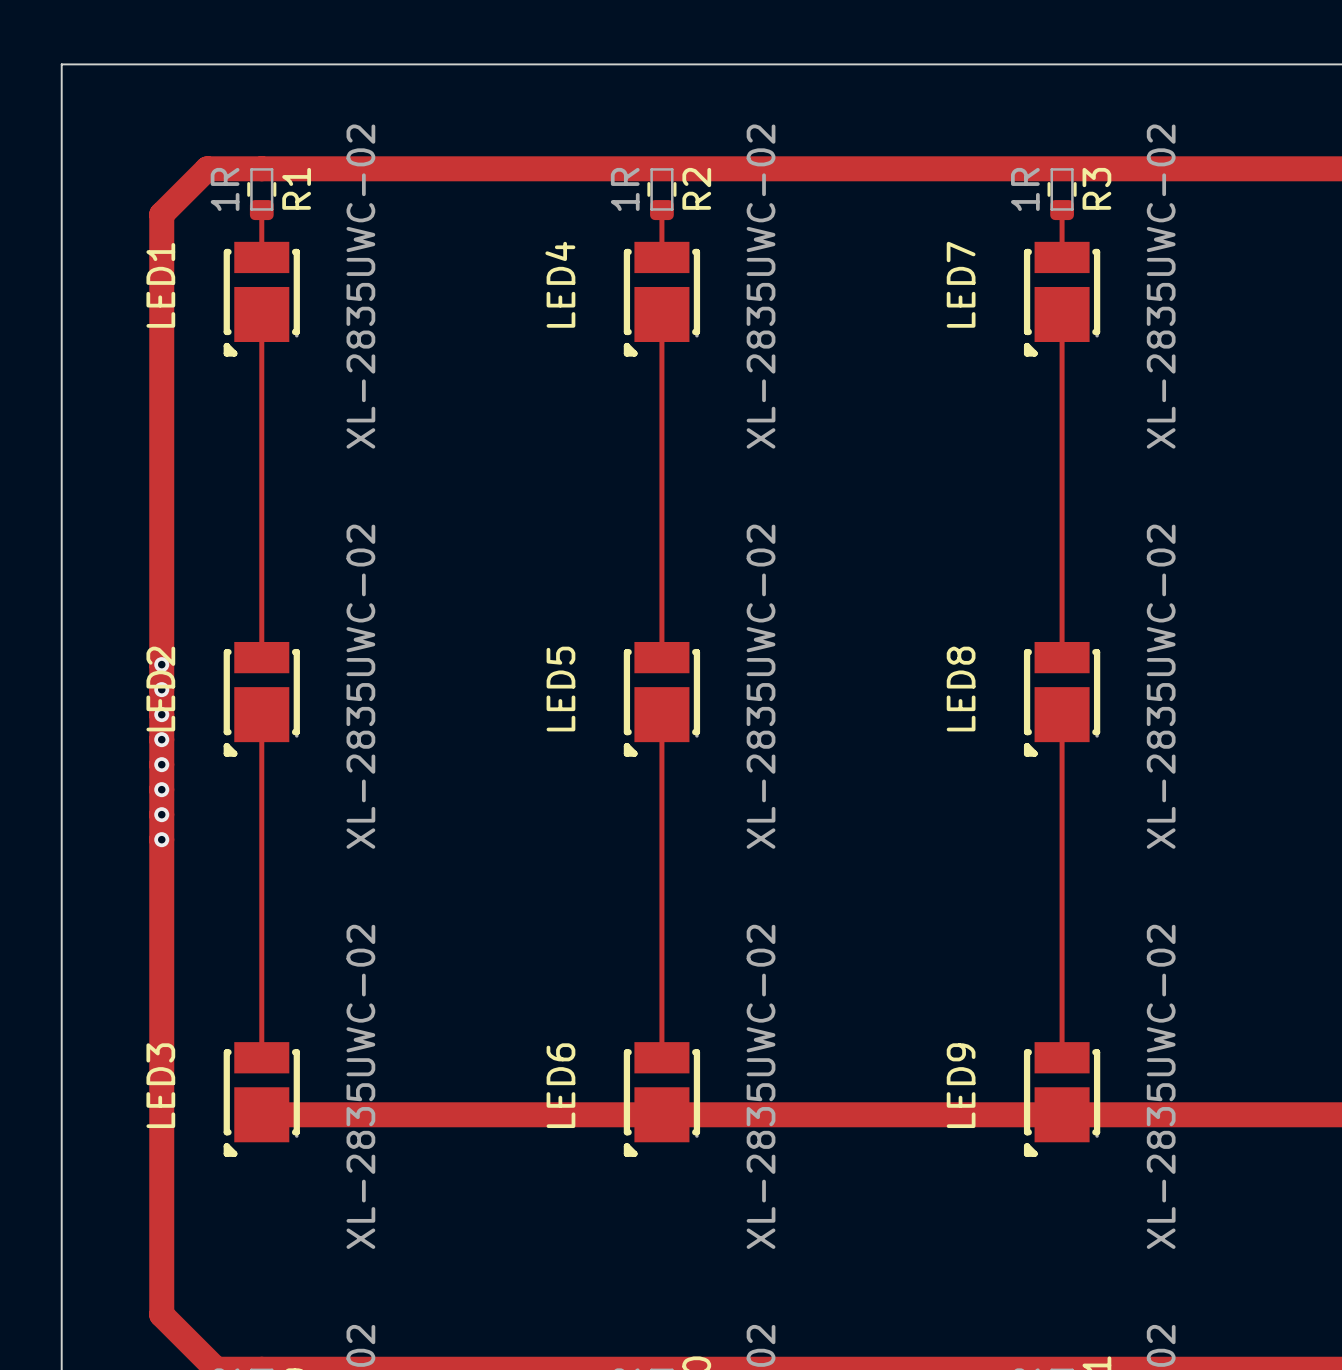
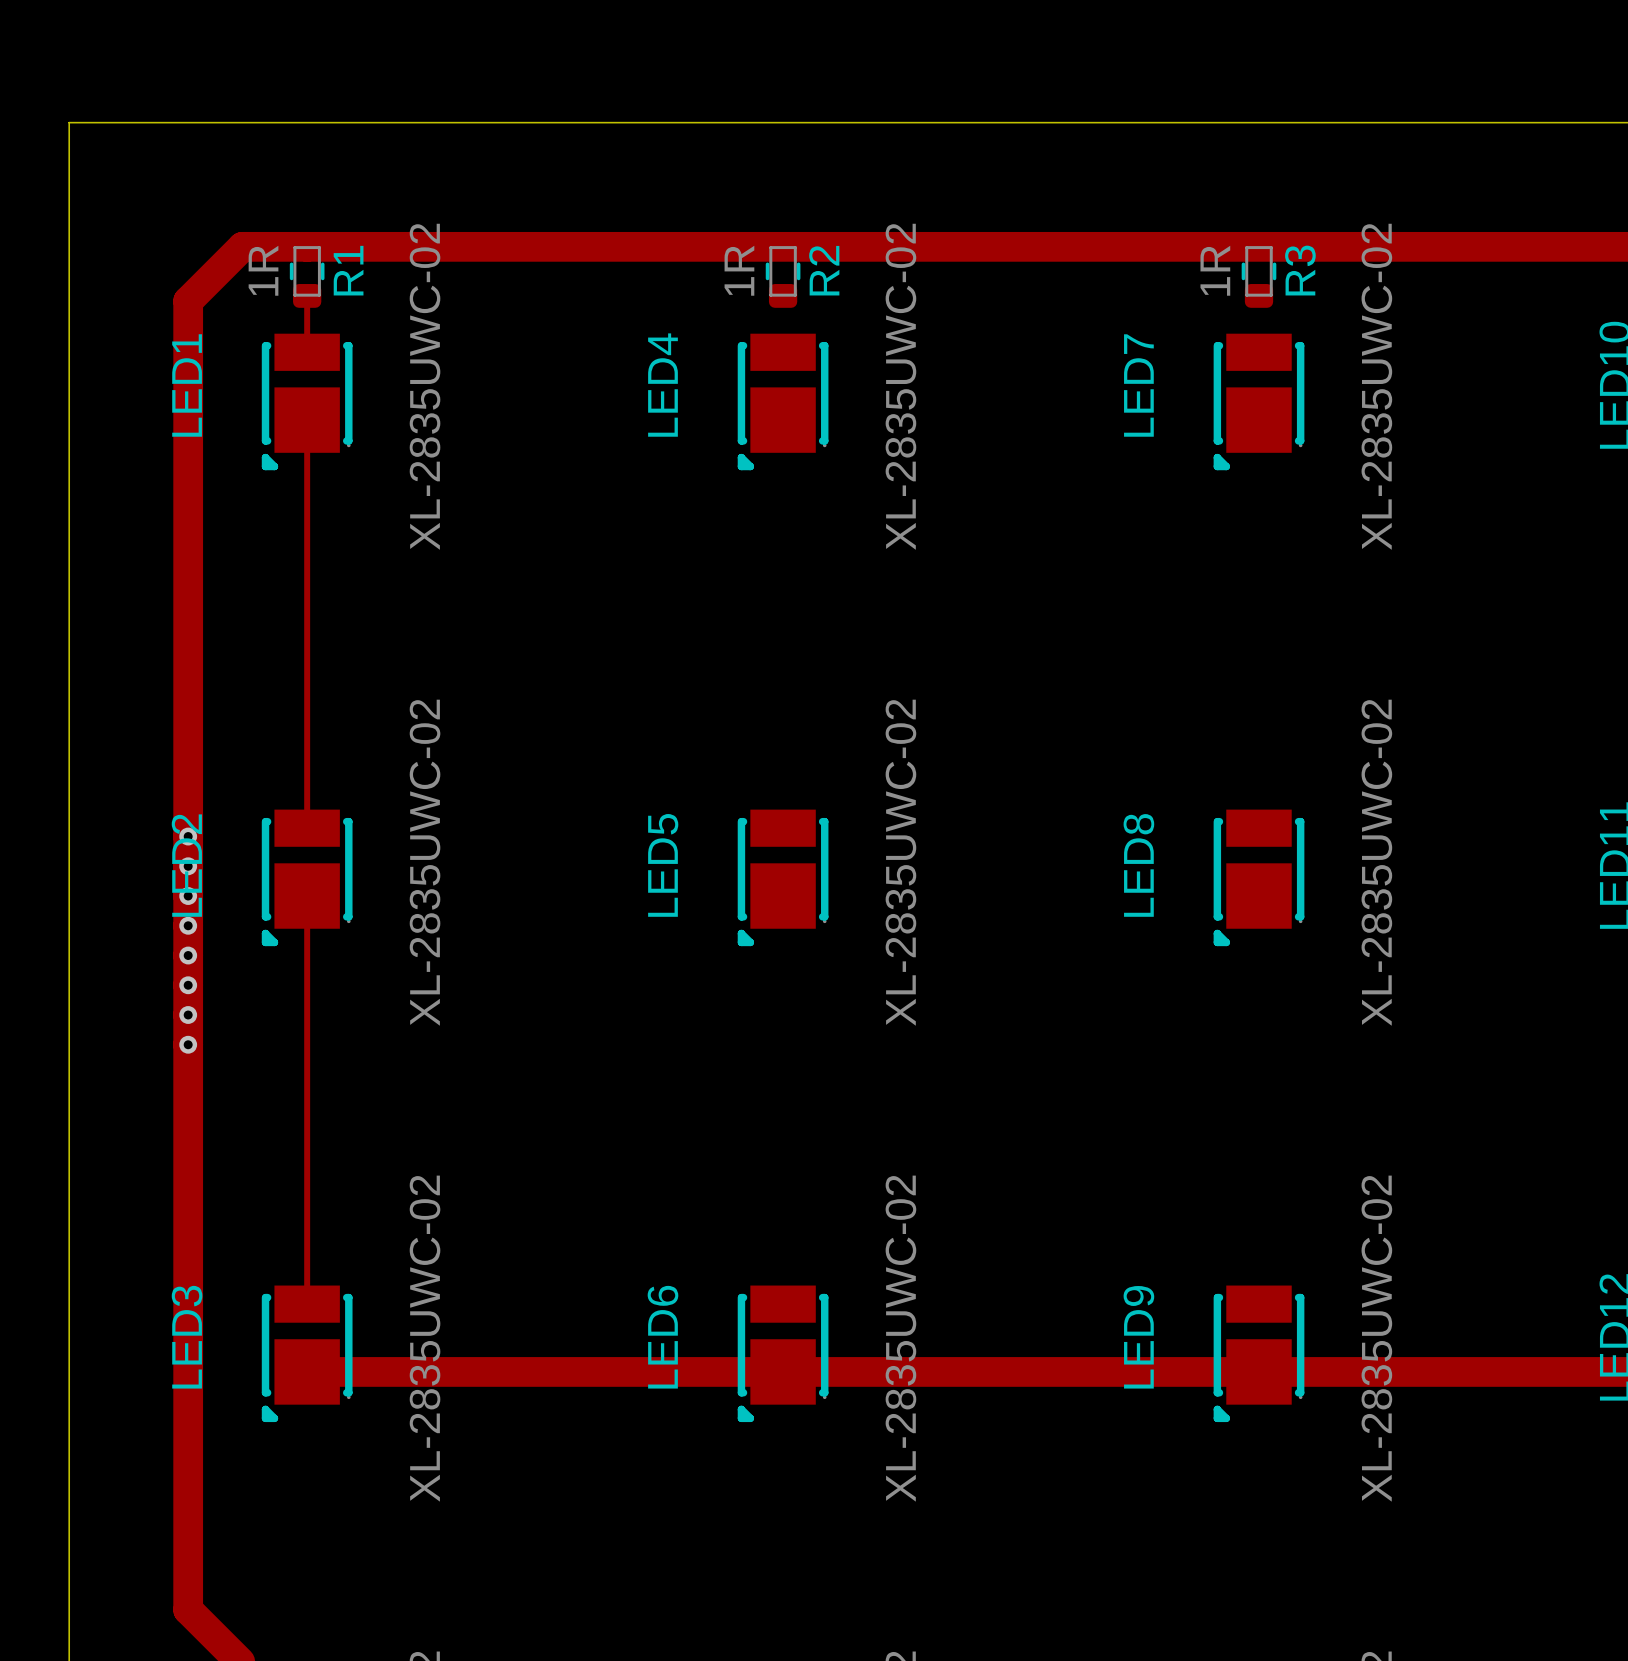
track: (661, 210) (661, 257) -> none
track: (1062, 210) (1062, 257) -> none
track: (661, 314) (661, 657) -> none
track: (1062, 314) (1062, 657) -> none
track: (661, 714) (661, 1057) -> none
track: (1062, 714) (1062, 1057) -> none

